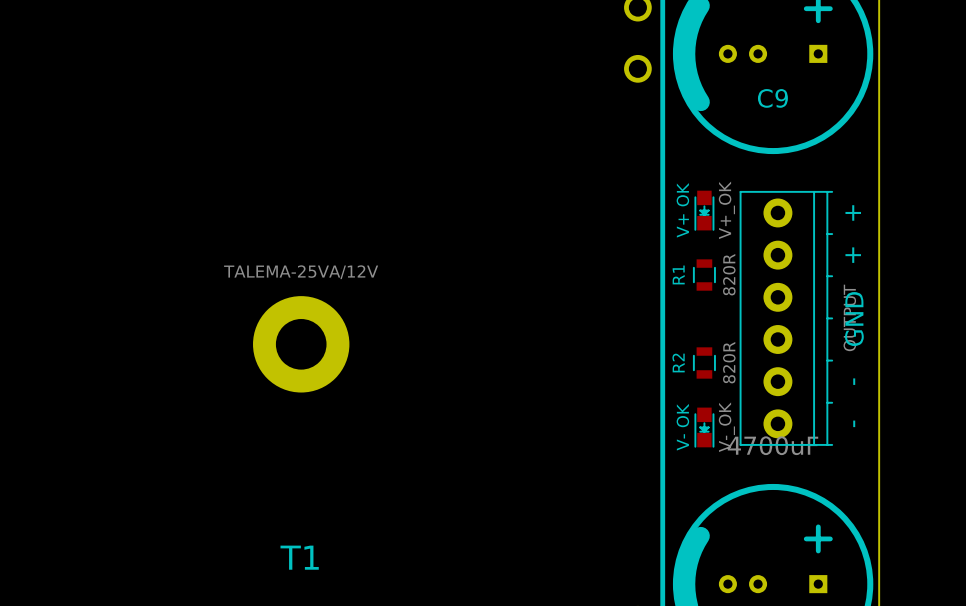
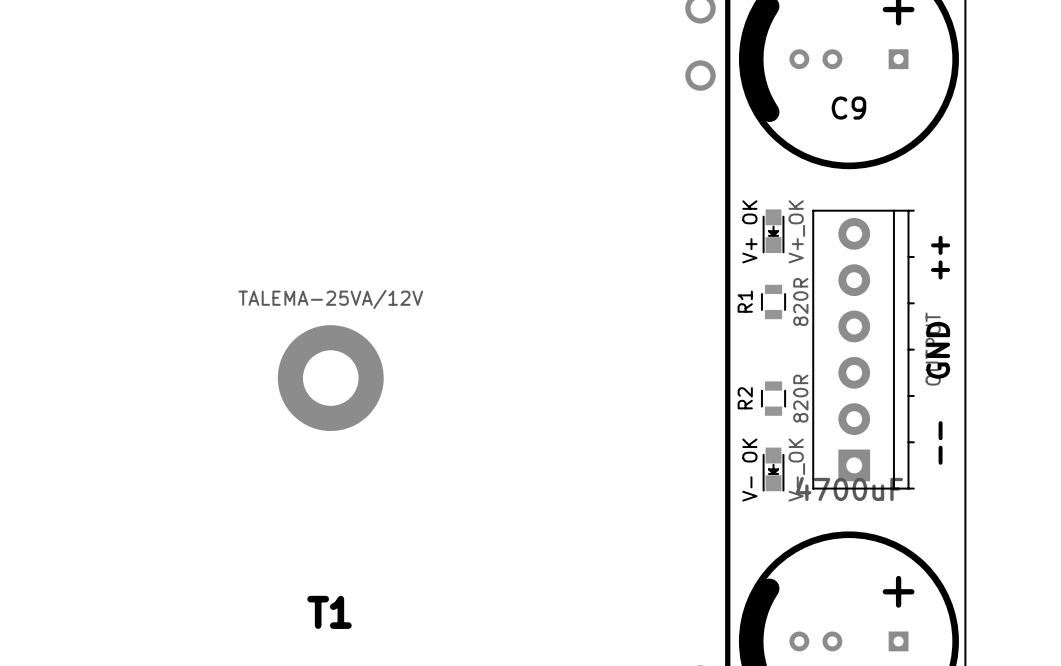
part footprint: [739, 190, 834, 446] -> [812, 209, 915, 490]
text: + (853, 212) -> none
text: none -> ++ (940, 257)
text: + (853, 255) -> none
text: - (854, 381) -> none
text: none -> -- (940, 442)
text: - (854, 423) -> none

